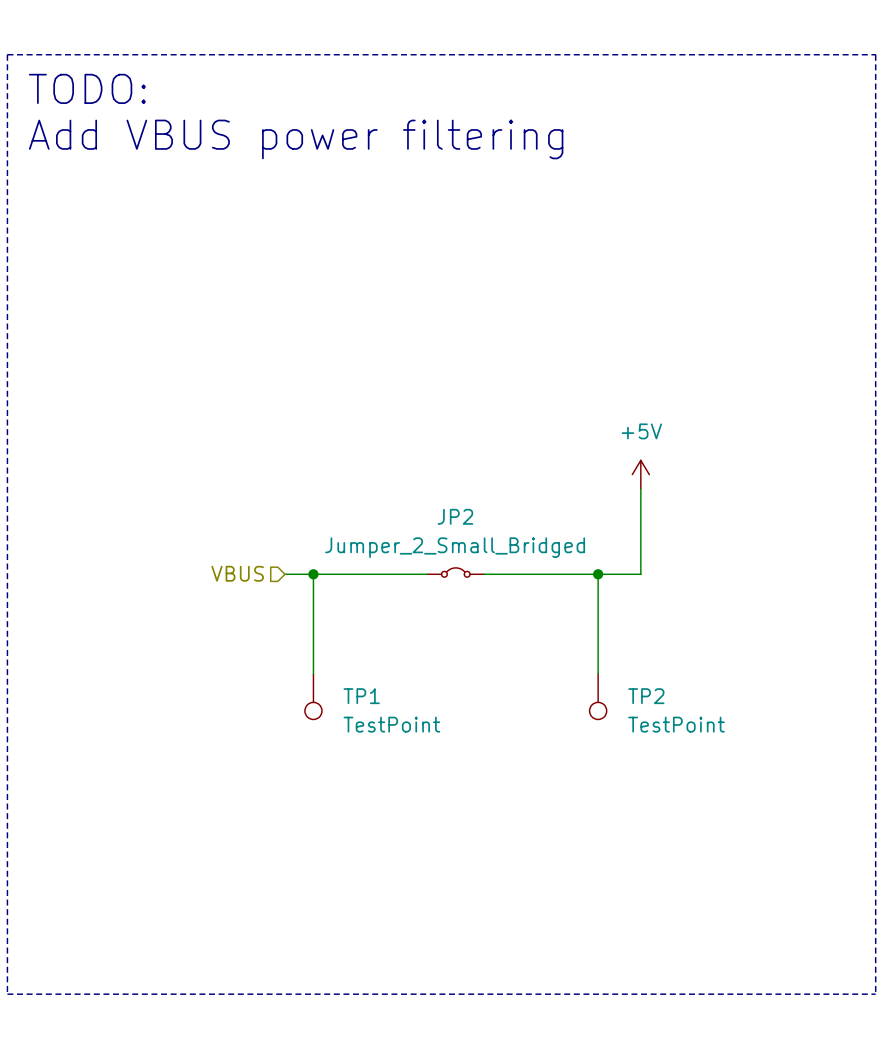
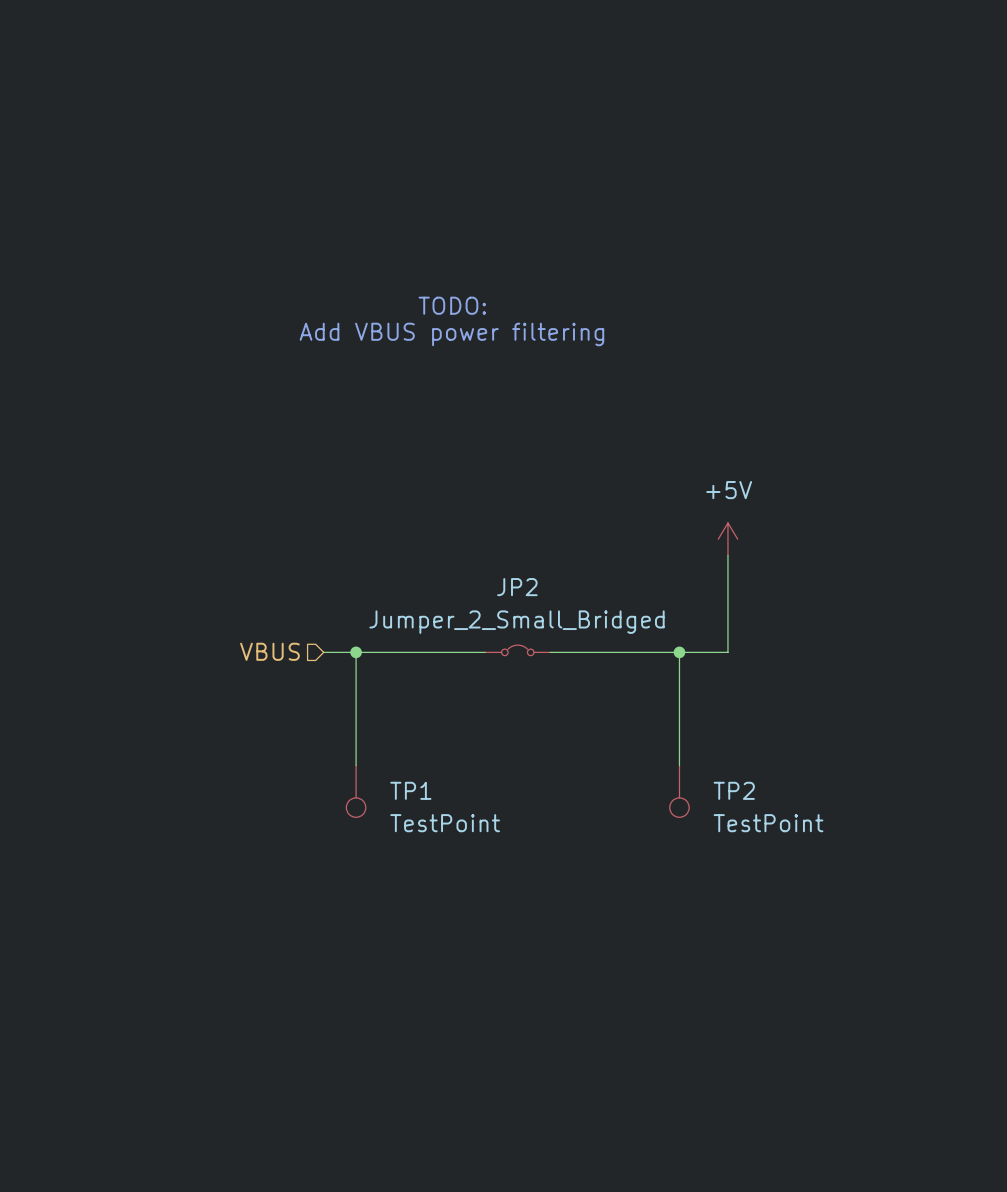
line: (7, 54) (875, 54) (875, 994) (7, 994) (7, 54) -> none
text: TODO: (87, 88) -> none
text: Add VBUS power filtering (296, 139) -> none
text: none -> TODO: (452, 305)
text: none -> Add VBUS power filtering (451, 334)

